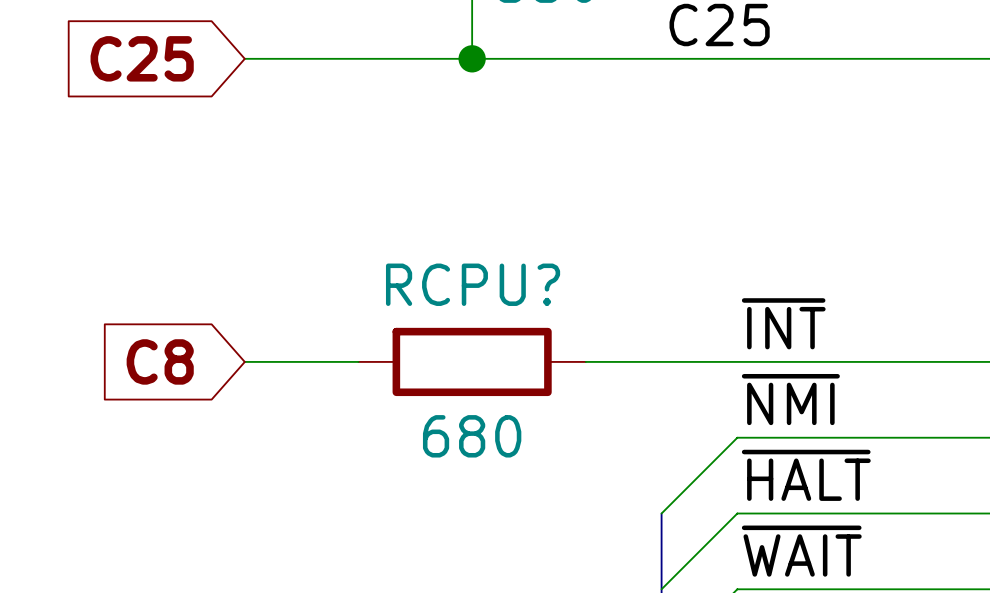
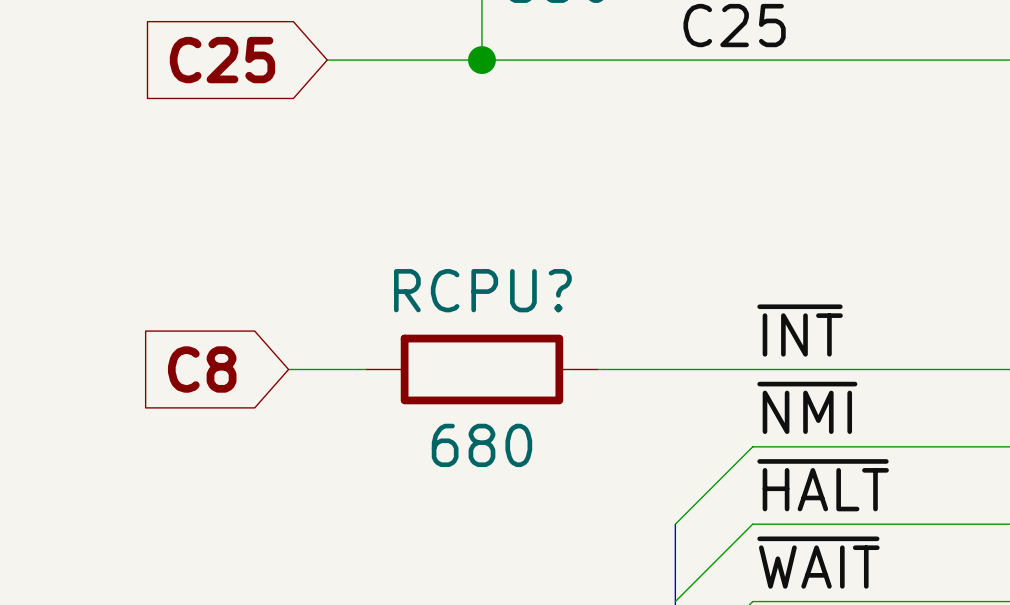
global label position: C25 (142, 58) -> C25 (222, 60)
wire: (244, 58) (320, 58) -> none
global label position: C8 (160, 361) -> C8 (202, 369)
wire: (244, 361) (282, 361) -> none

